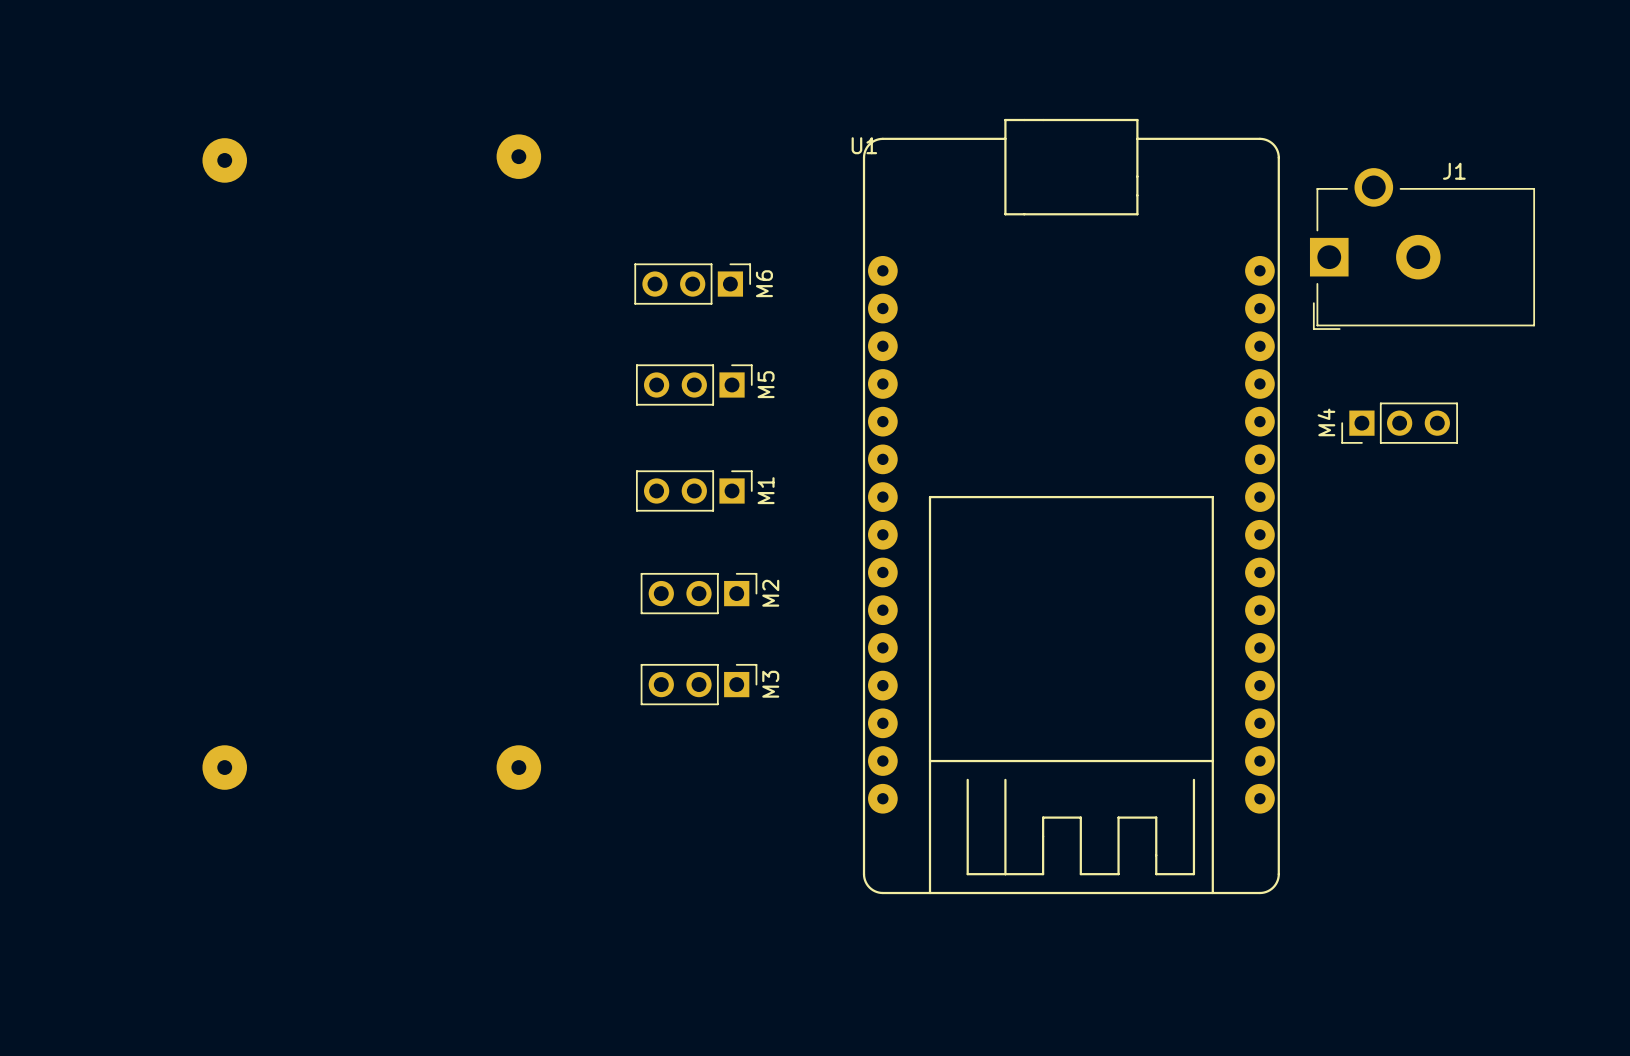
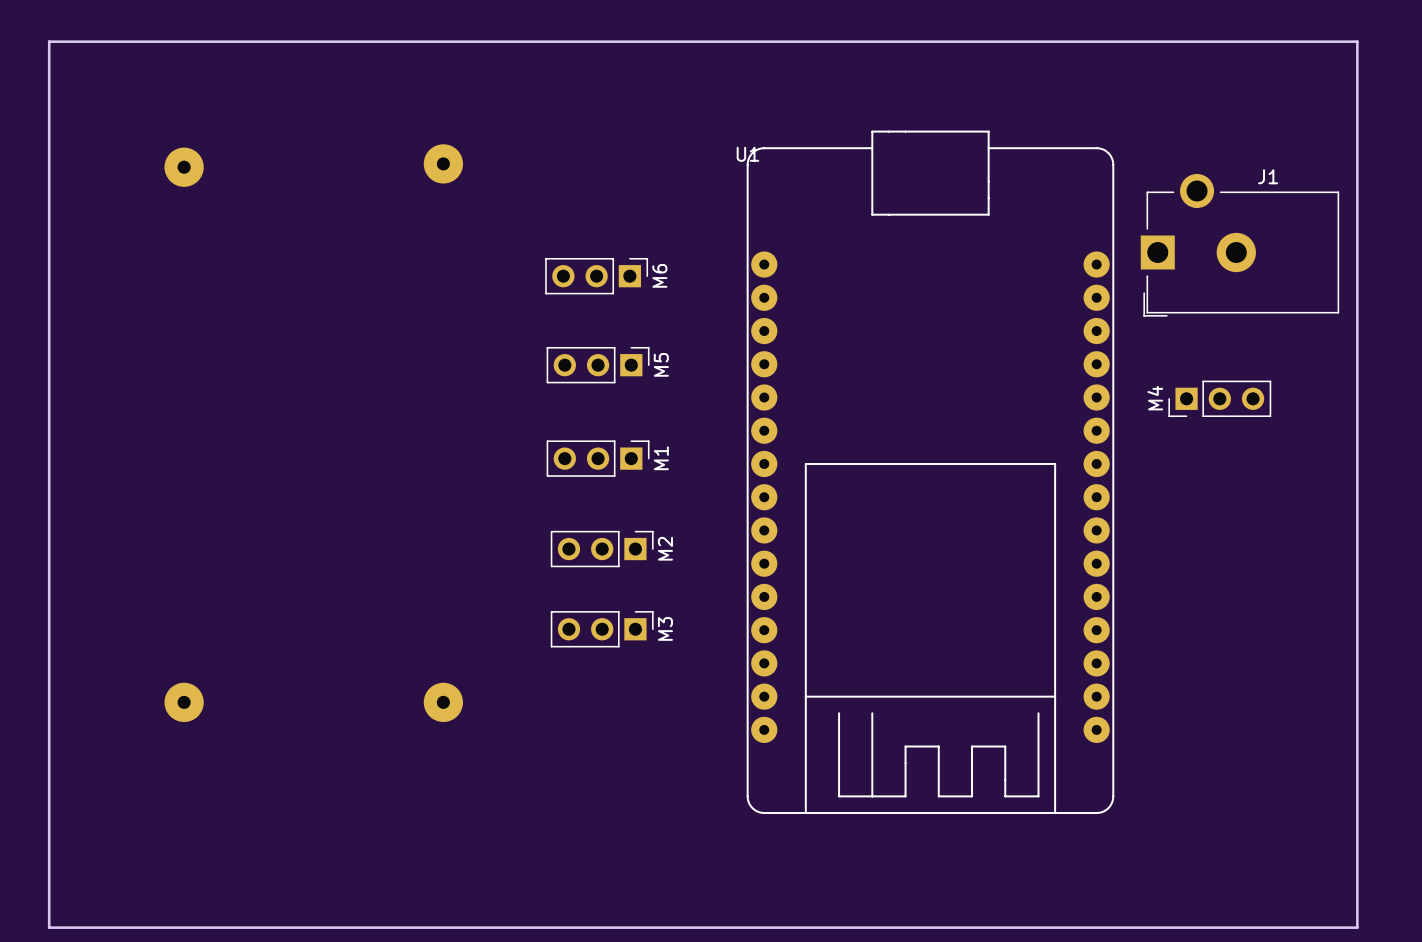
board edge: none -> (49, 41) (1357, 41) (1357, 927) (49, 927) (49, 41)

